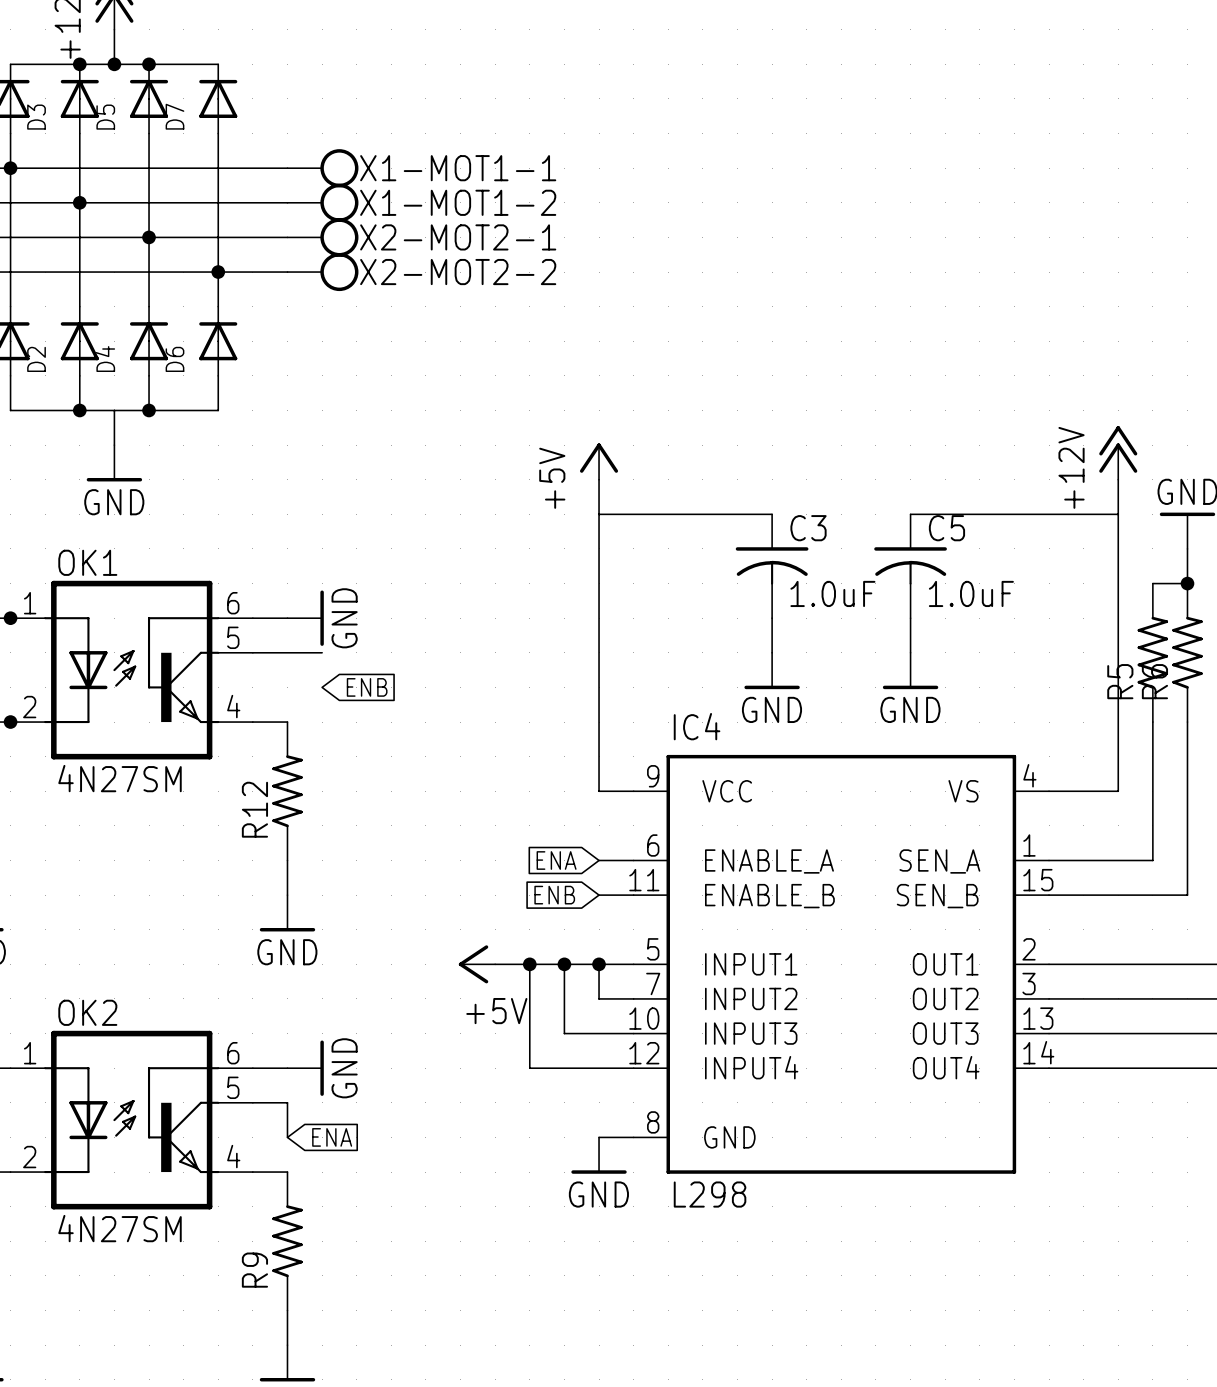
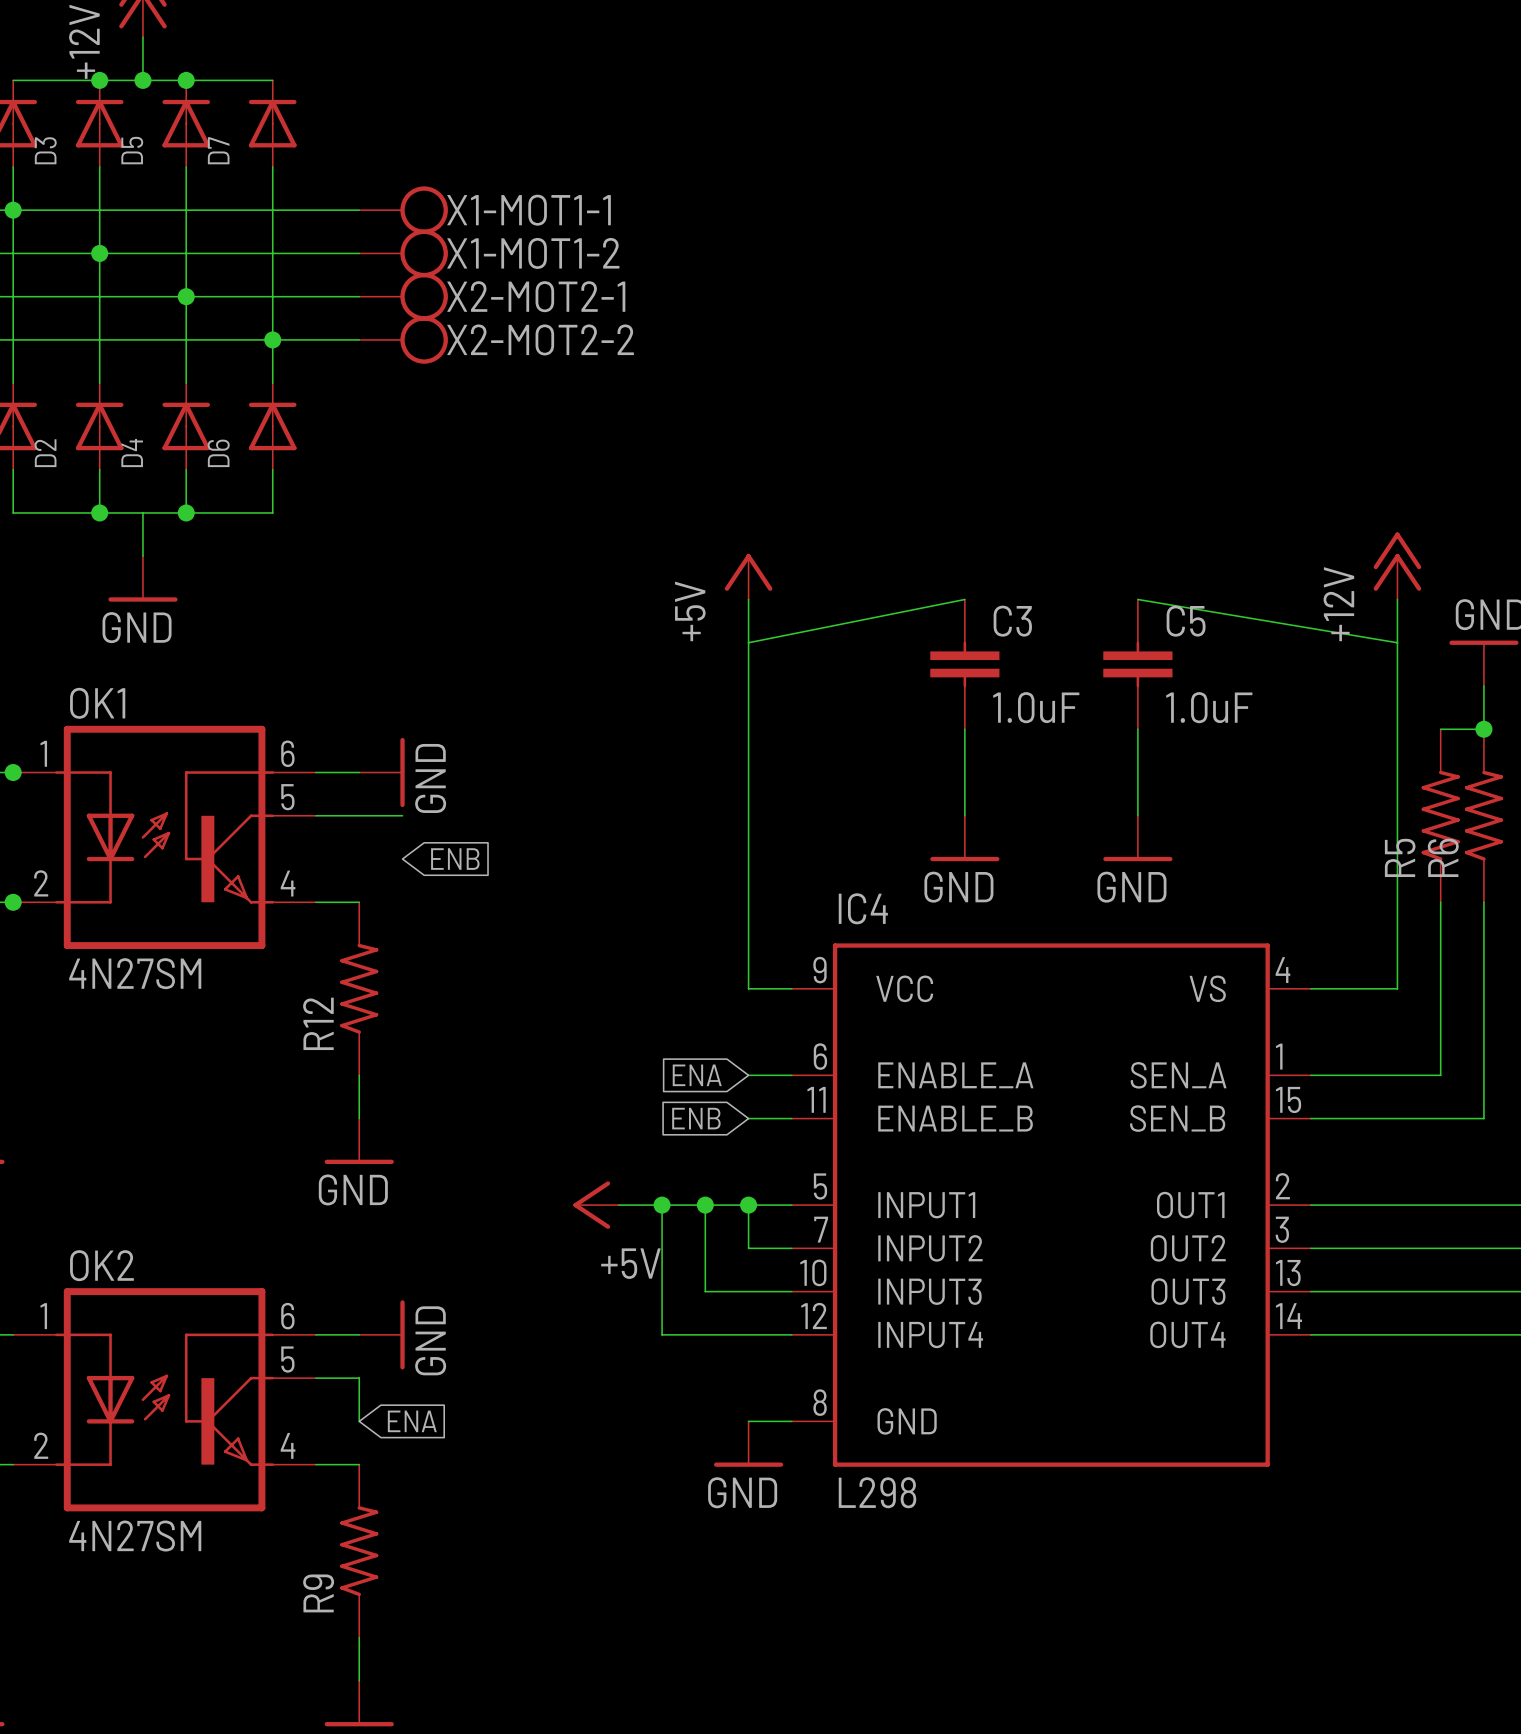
wire: (599, 514) (772, 514) -> (748, 642) (964, 599)
C3 symbol: [735, 514, 809, 619] -> [930, 599, 1000, 730]
C5 symbol: [874, 514, 947, 619] -> [1103, 599, 1173, 730]
wire: (910, 514) (1118, 514) -> (1137, 599) (1397, 642)

